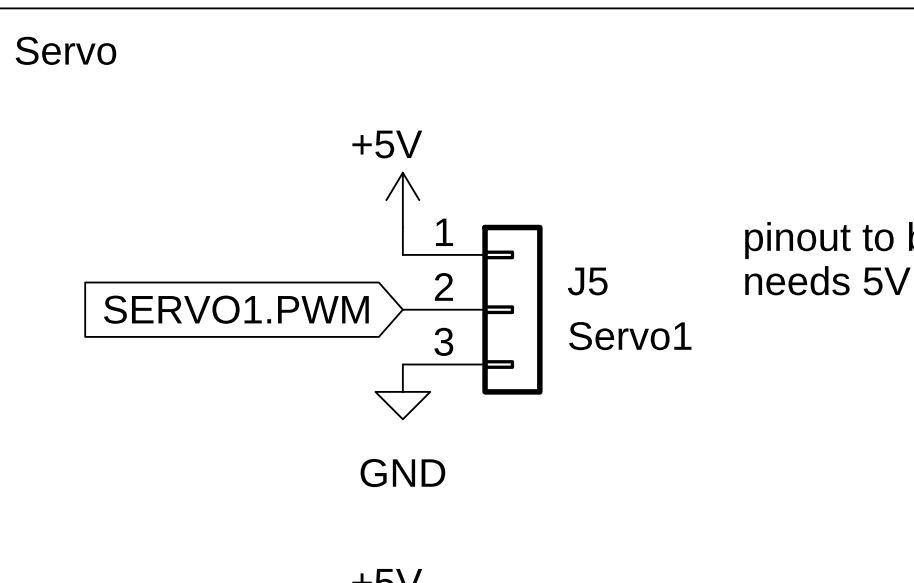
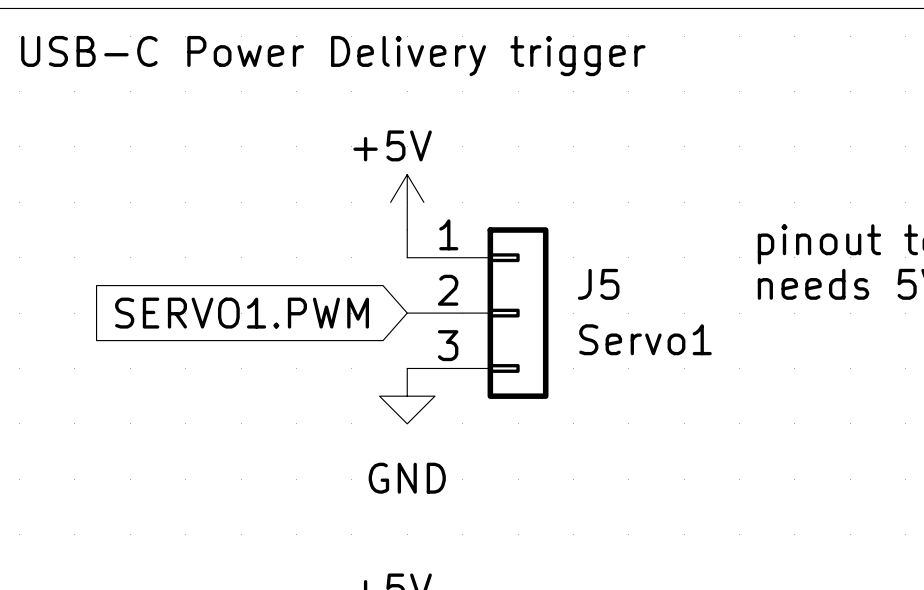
text: Servo (65, 50) -> USB-C Power Delivery trigger (333, 56)

